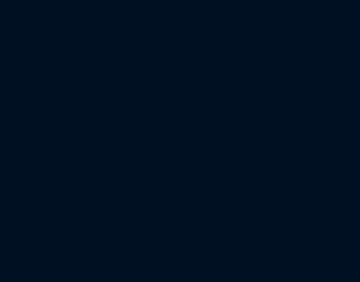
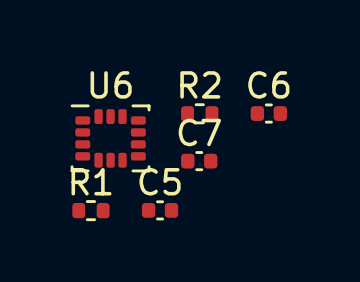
R2: none -> (199, 113)
C6: none -> (268, 113)
U6: none -> (110, 138)
C7: none -> (199, 161)
R1: none -> (90, 210)
C5: none -> (160, 210)

